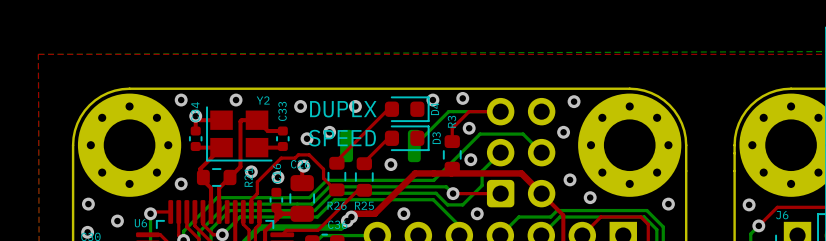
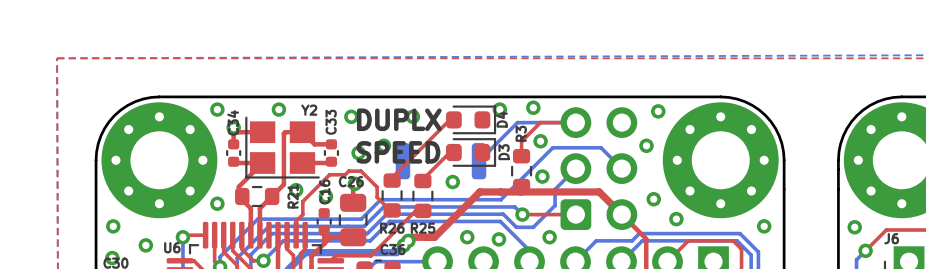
via: none -> (498, 239)

